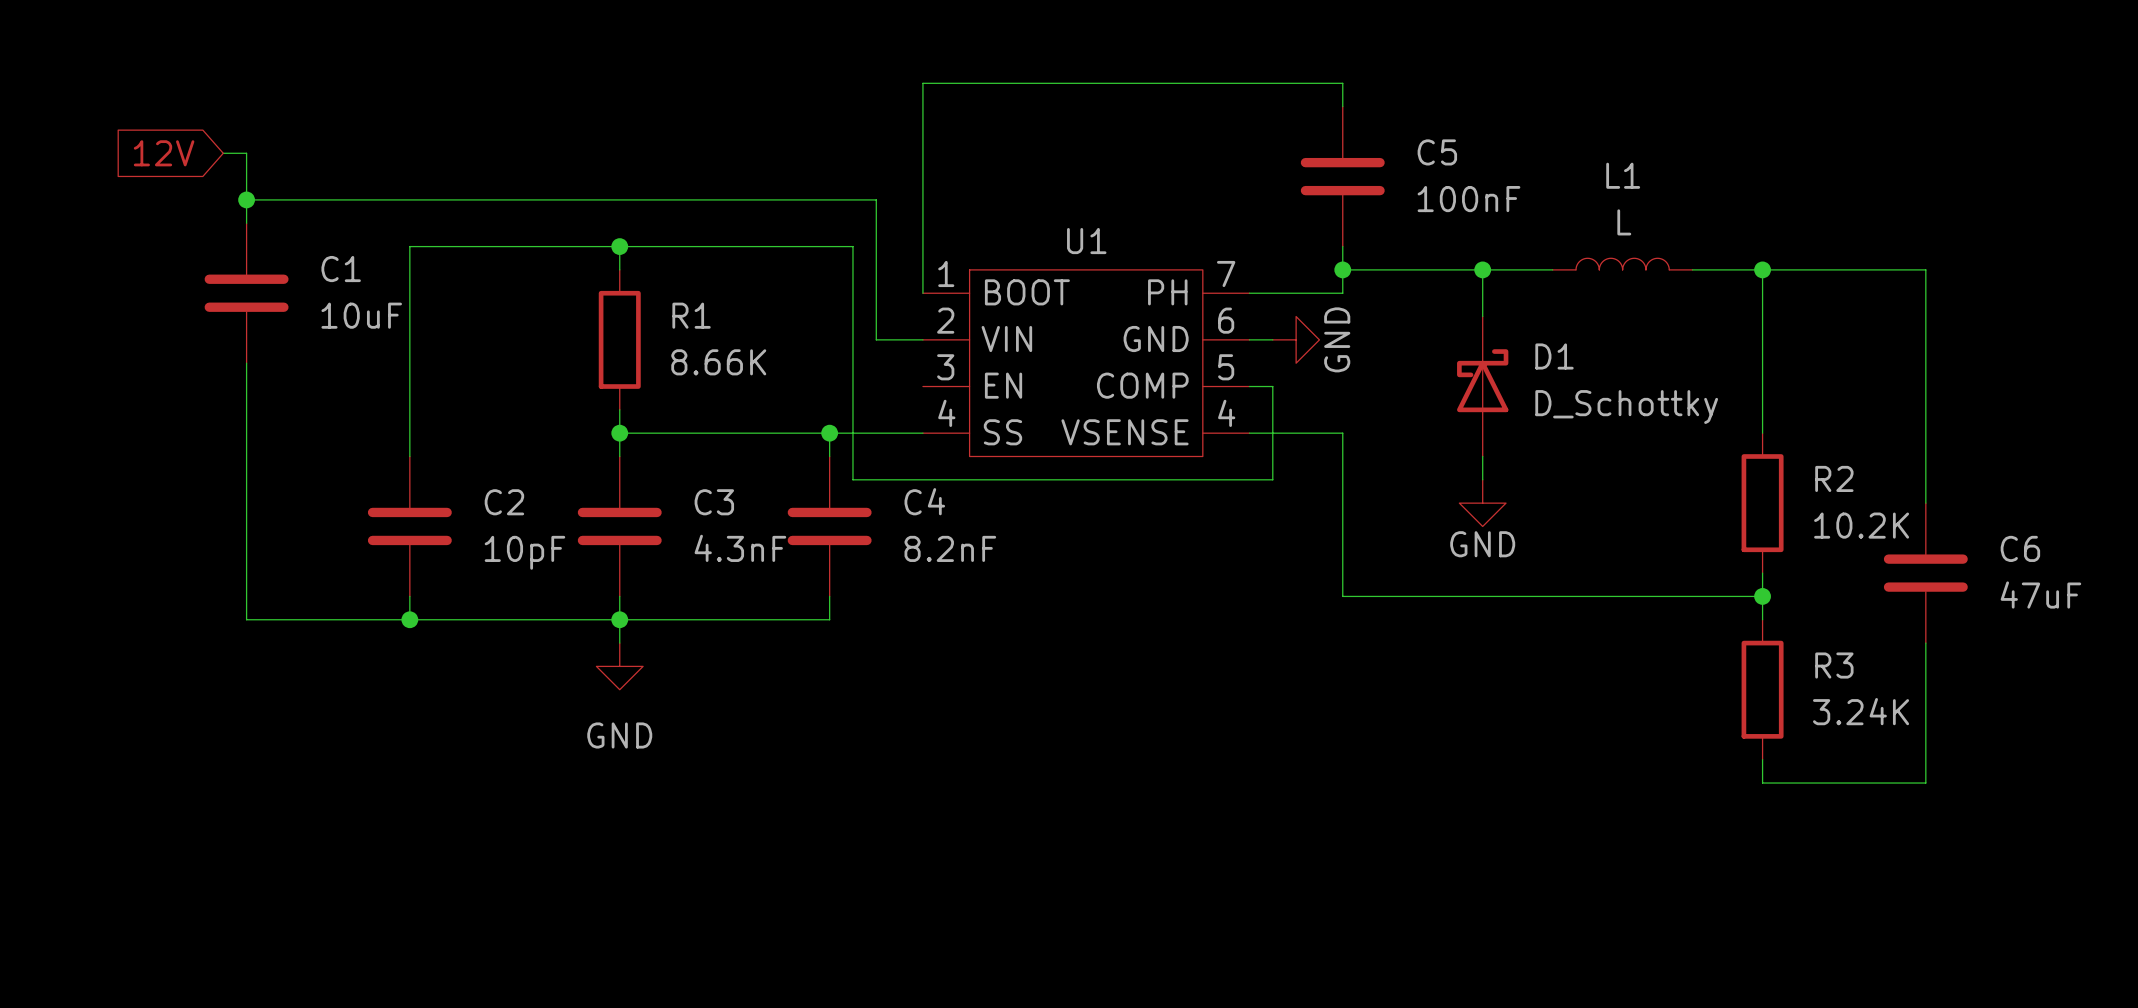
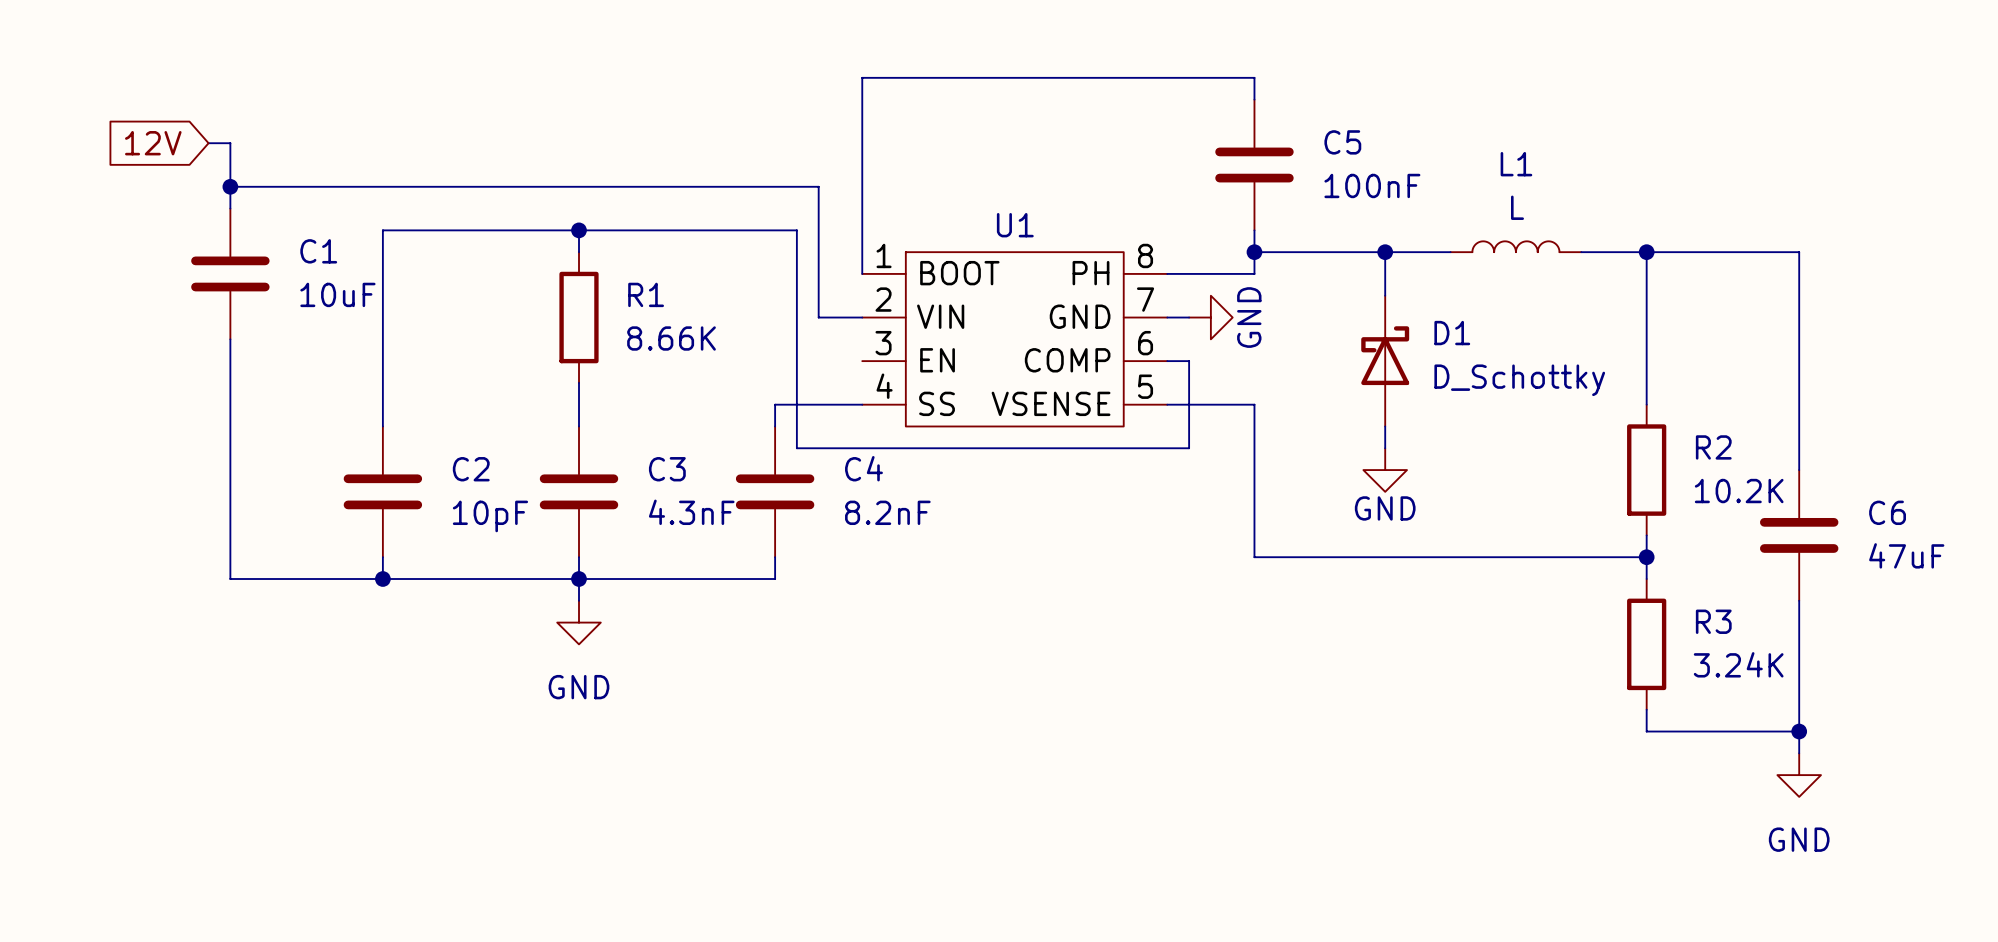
U1 pin number: 7 (1226, 273) -> 8 (1145, 255)
U1 pin number: 6 (1226, 320) -> 7 (1145, 299)
U1 pin number: 5 (1226, 367) -> 6 (1145, 343)
U1 pin number: 4 (1226, 413) -> 5 (1145, 386)
wire: (619, 433) (829, 433) -> none
junction: (619, 433) -> none
junction: (829, 433) -> none
wire: none -> (1799, 731) (1799, 753)
junction: none -> (1799, 731)
power symbol: none -> GND (1799, 775)

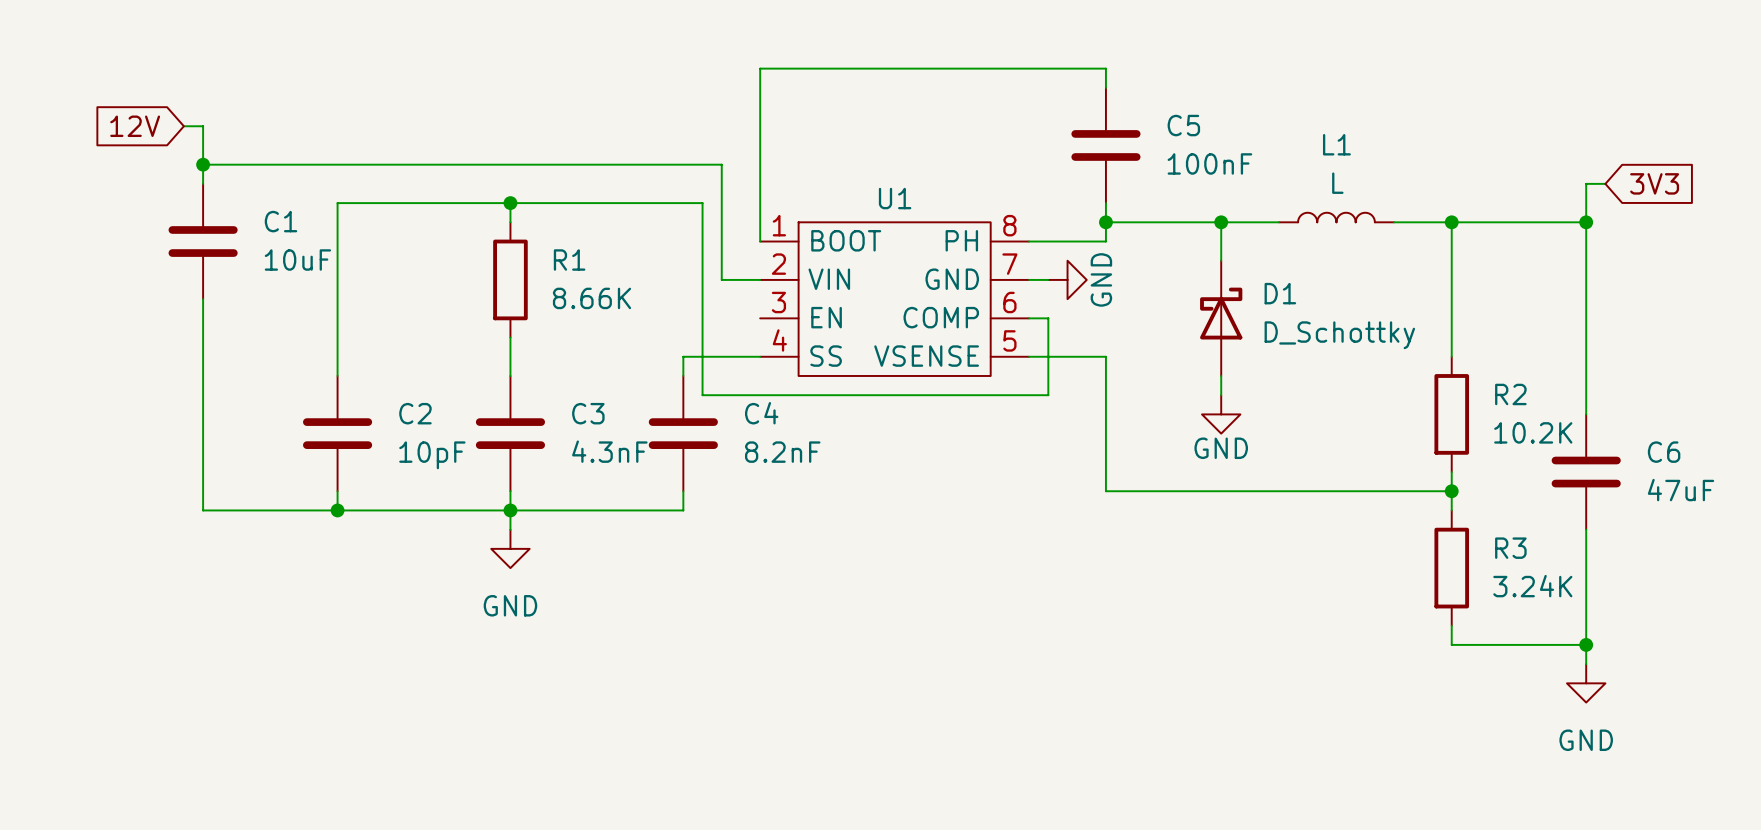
wire: none -> (1605, 183) (1586, 183) (1586, 222)
global label: none -> 3V3 (1654, 183)
junction: none -> (1586, 222)

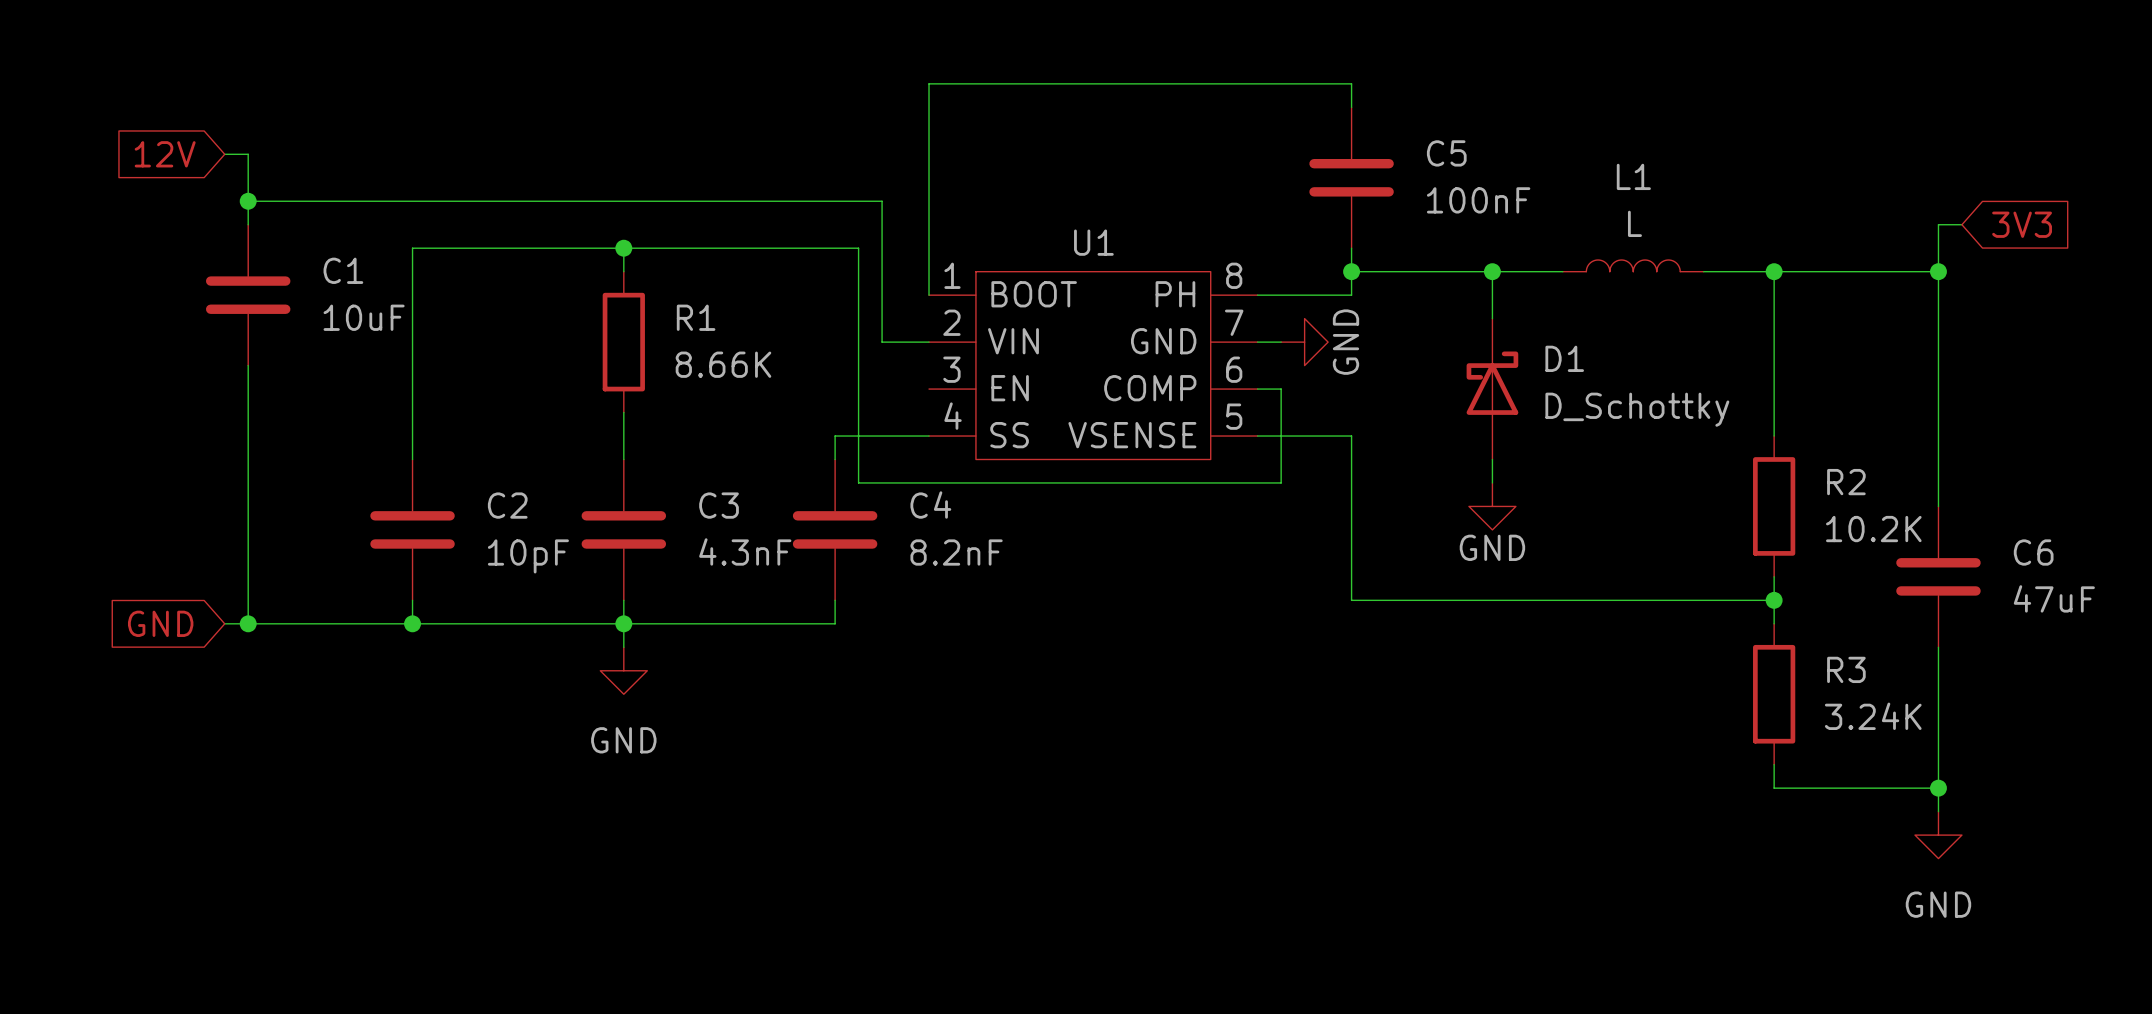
global label: none -> GND (160, 623)
wire: none -> (224, 623) (248, 623)
junction: none -> (248, 623)

